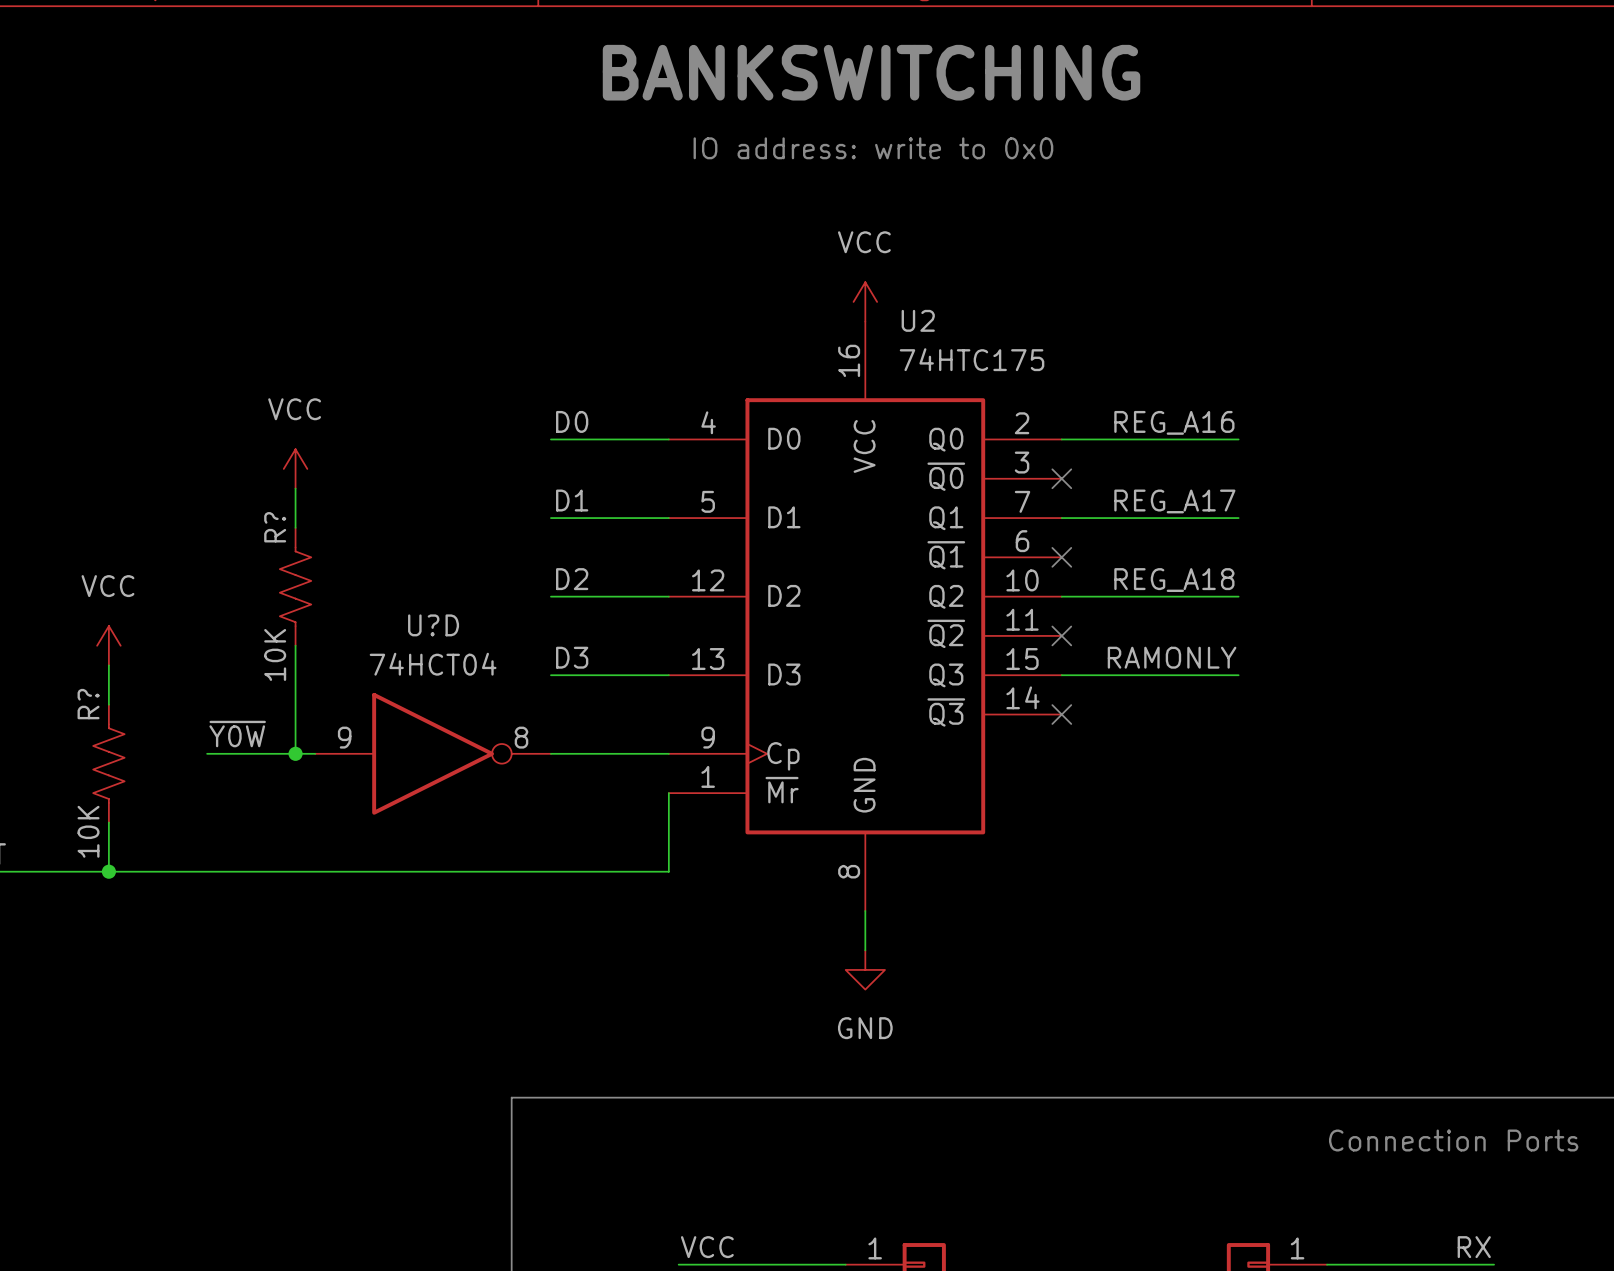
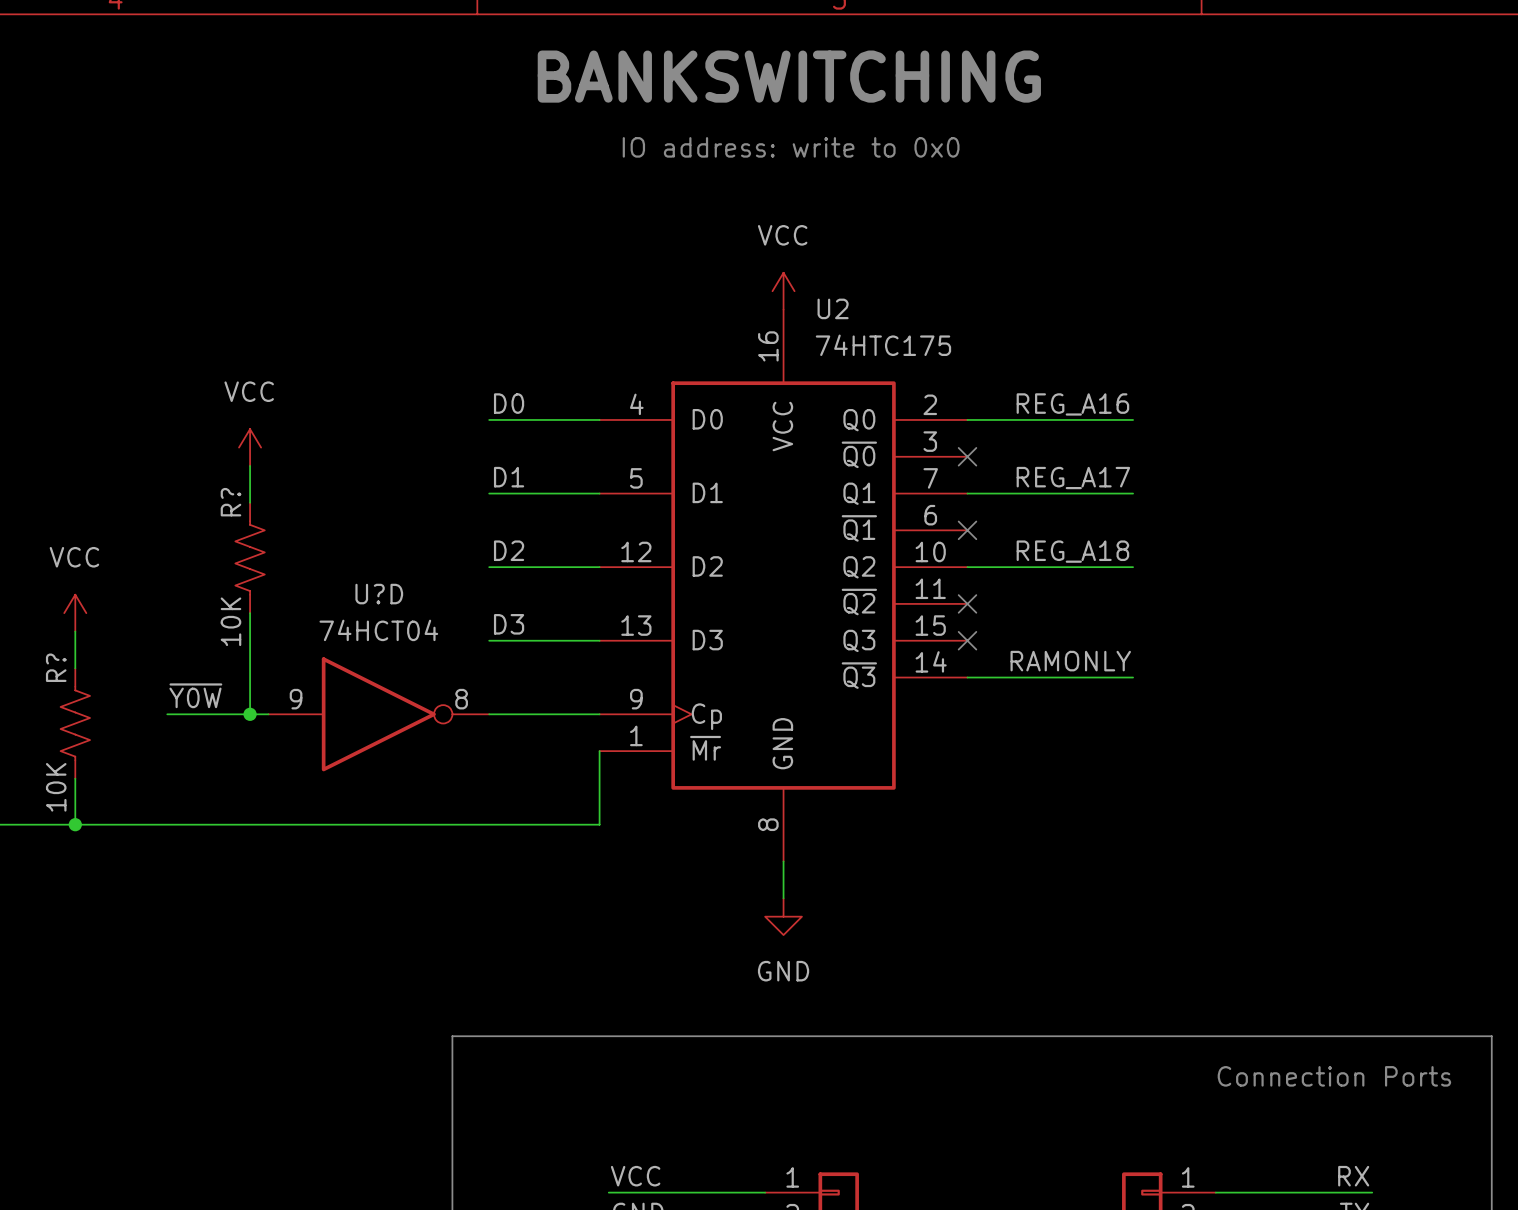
label position: RAMONLY (1172, 657) -> RAMONLY (1070, 661)
wire: (1061, 675) (1238, 675) -> (967, 677) (1133, 677)
no-connect mark position: (1061, 714) -> (967, 640)

